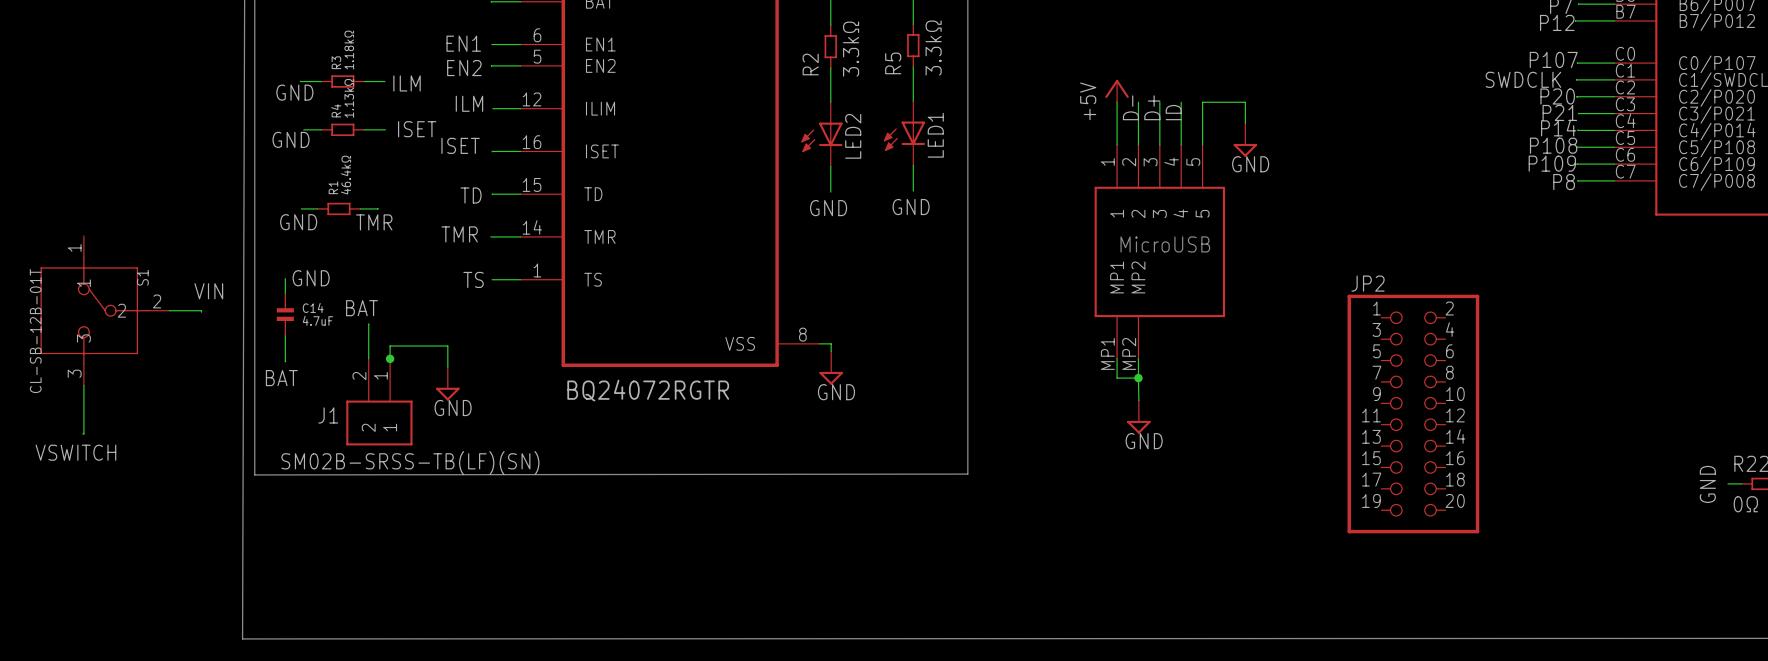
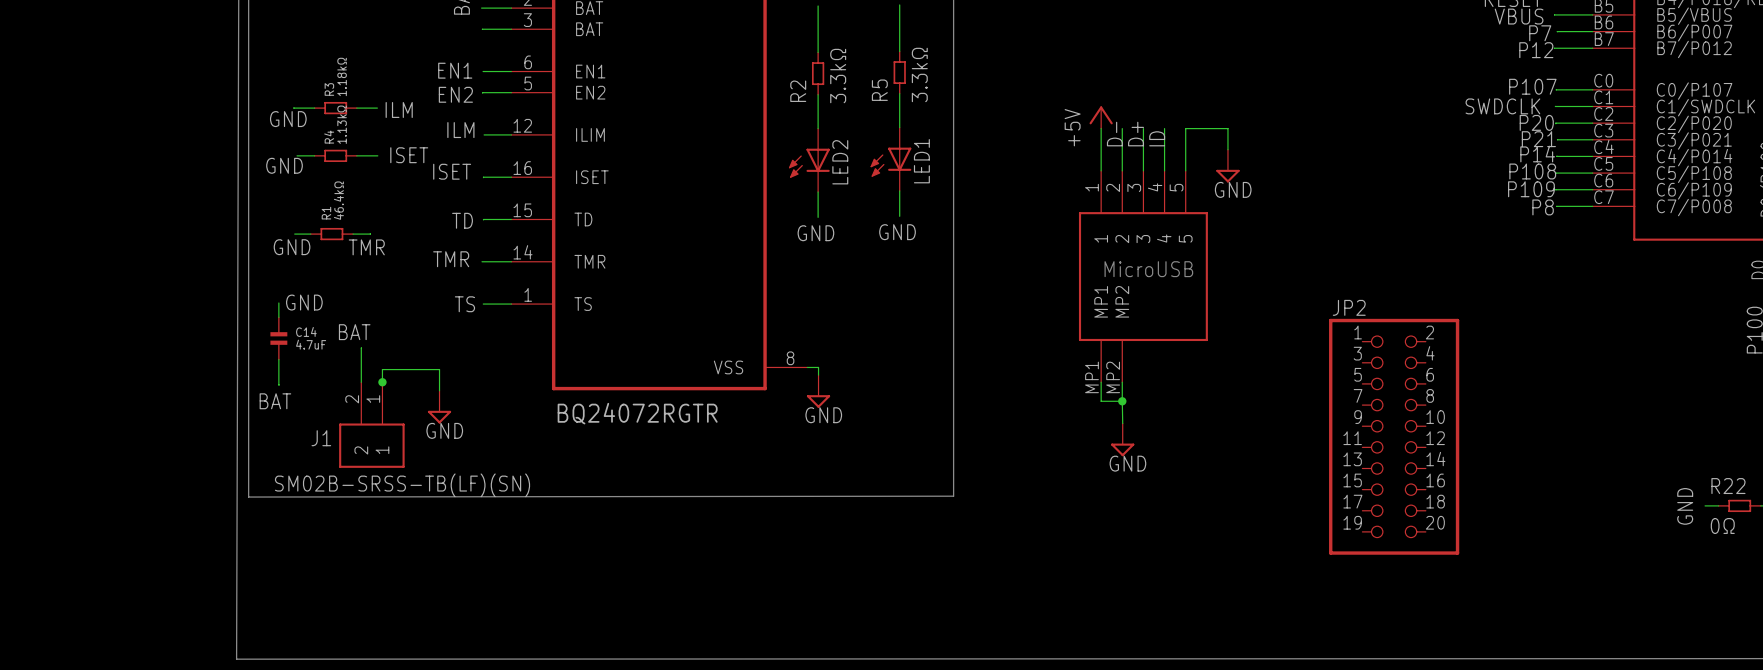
label: VIN (208, 291) -> none
S1: CL-SB-12B-01T (104, 310) -> none
wire: (169, 310) (201, 312) -> none
wire: (83, 385) (82, 433) -> none
label: VSWITCH (75, 452) -> none

